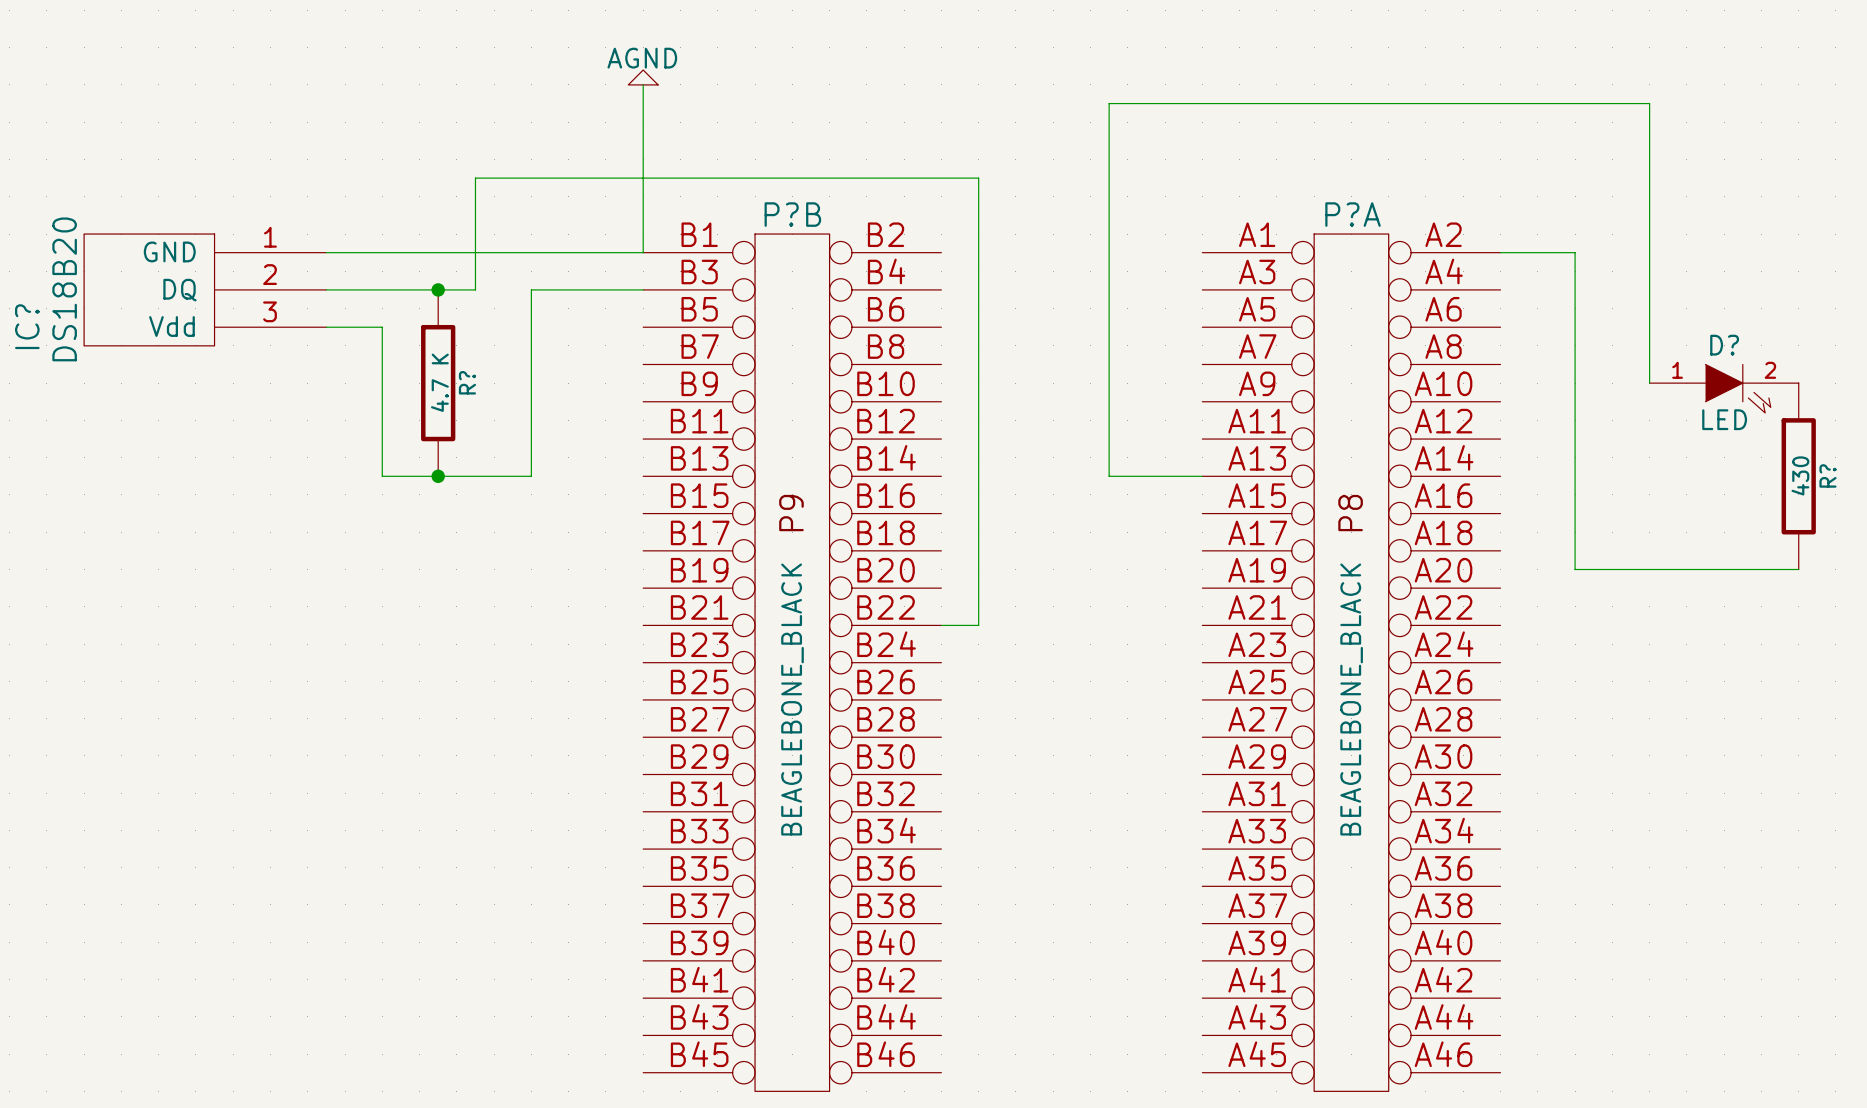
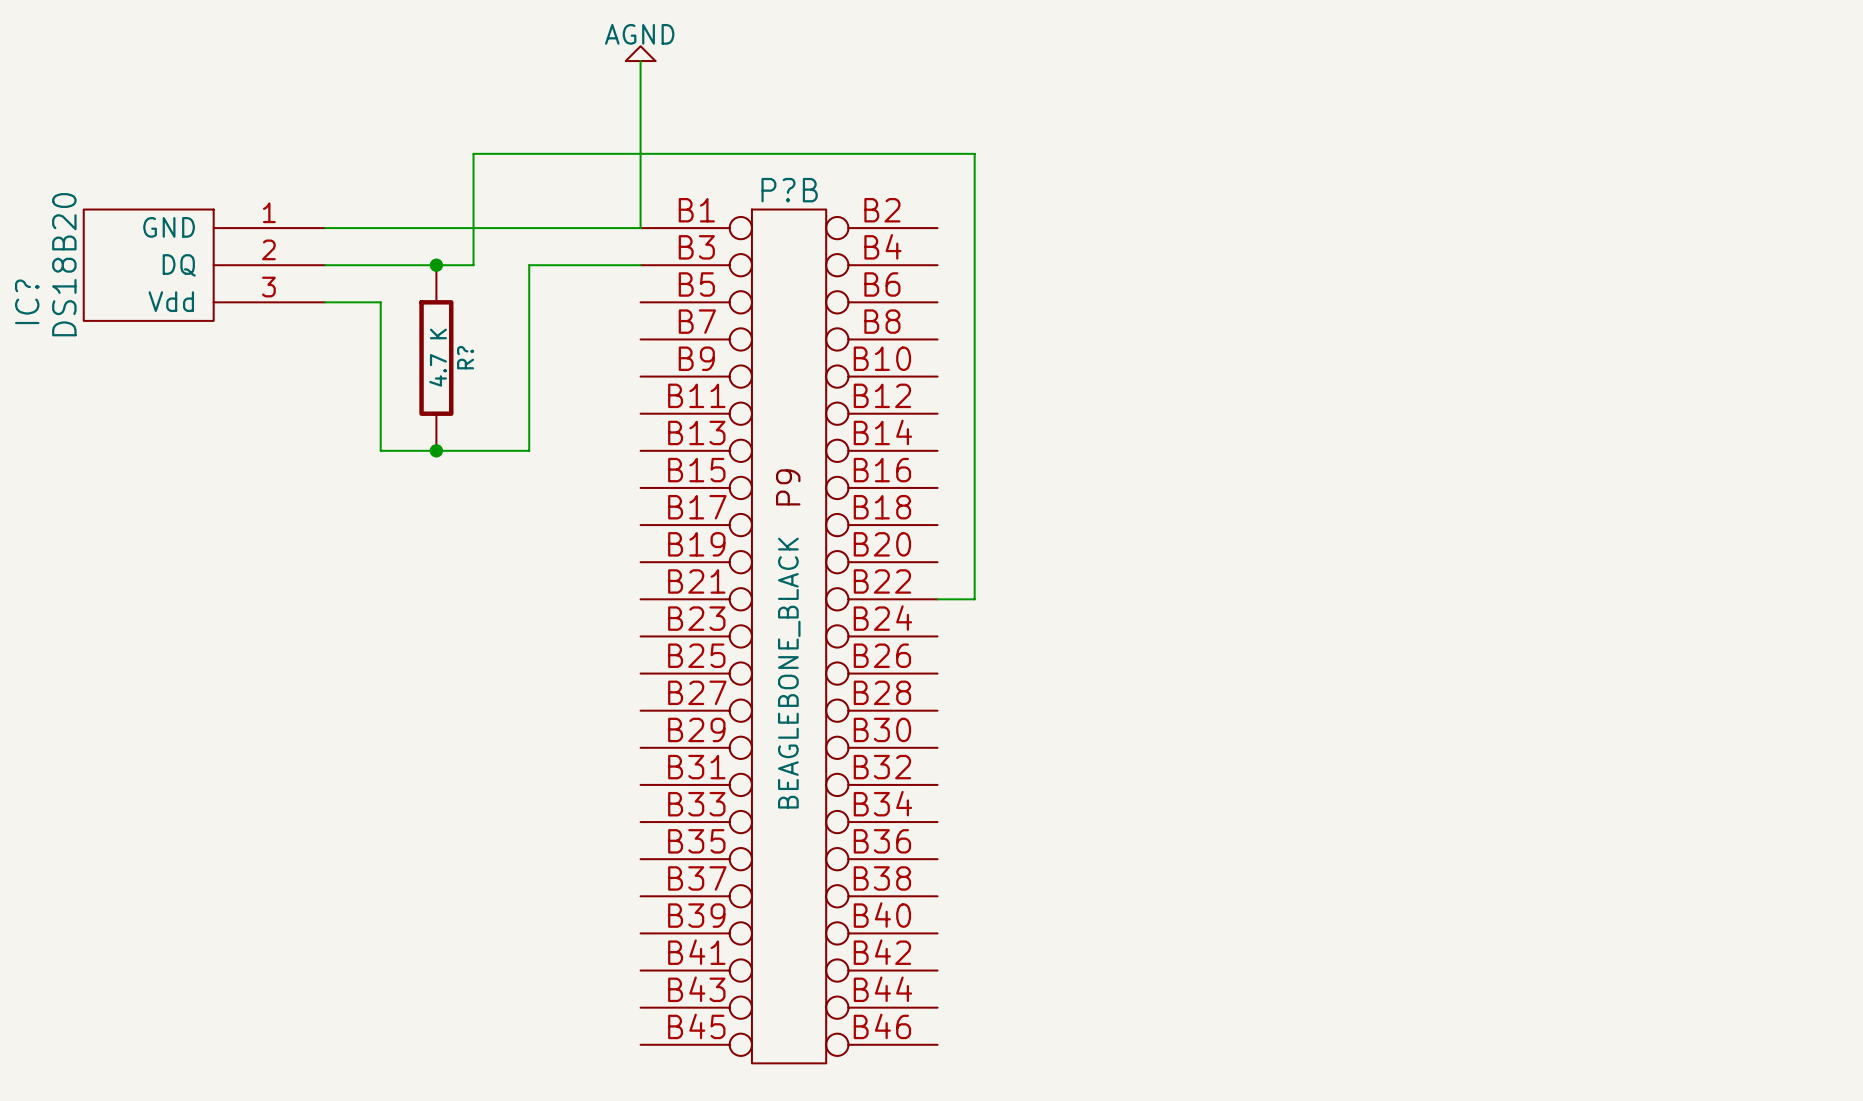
wire: (1500, 252) (1575, 252) (1575, 569) (1798, 569) -> none
wire: (1649, 383) (1649, 103) (1109, 103) (1109, 476) (1202, 476) -> none
D?: LED (1724, 388) -> none
R?: 430 (1798, 476) -> none
P?A: BEAGLEBONE_BLACK (1351, 662) -> none

